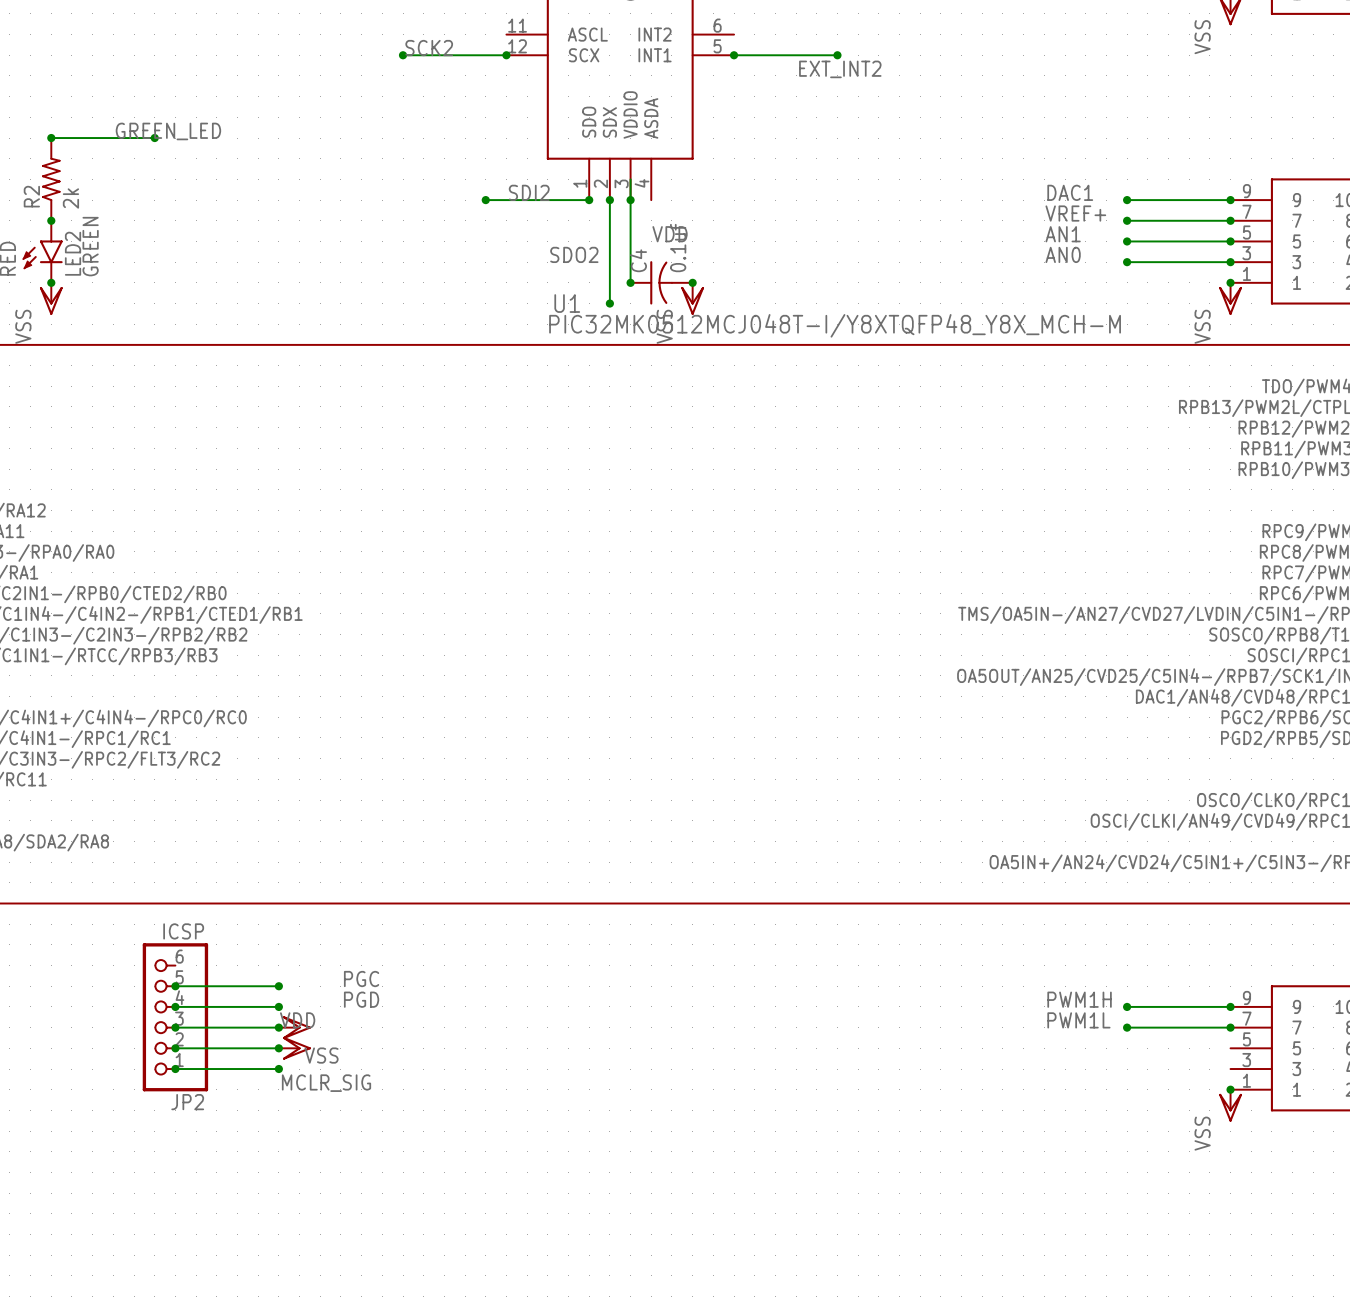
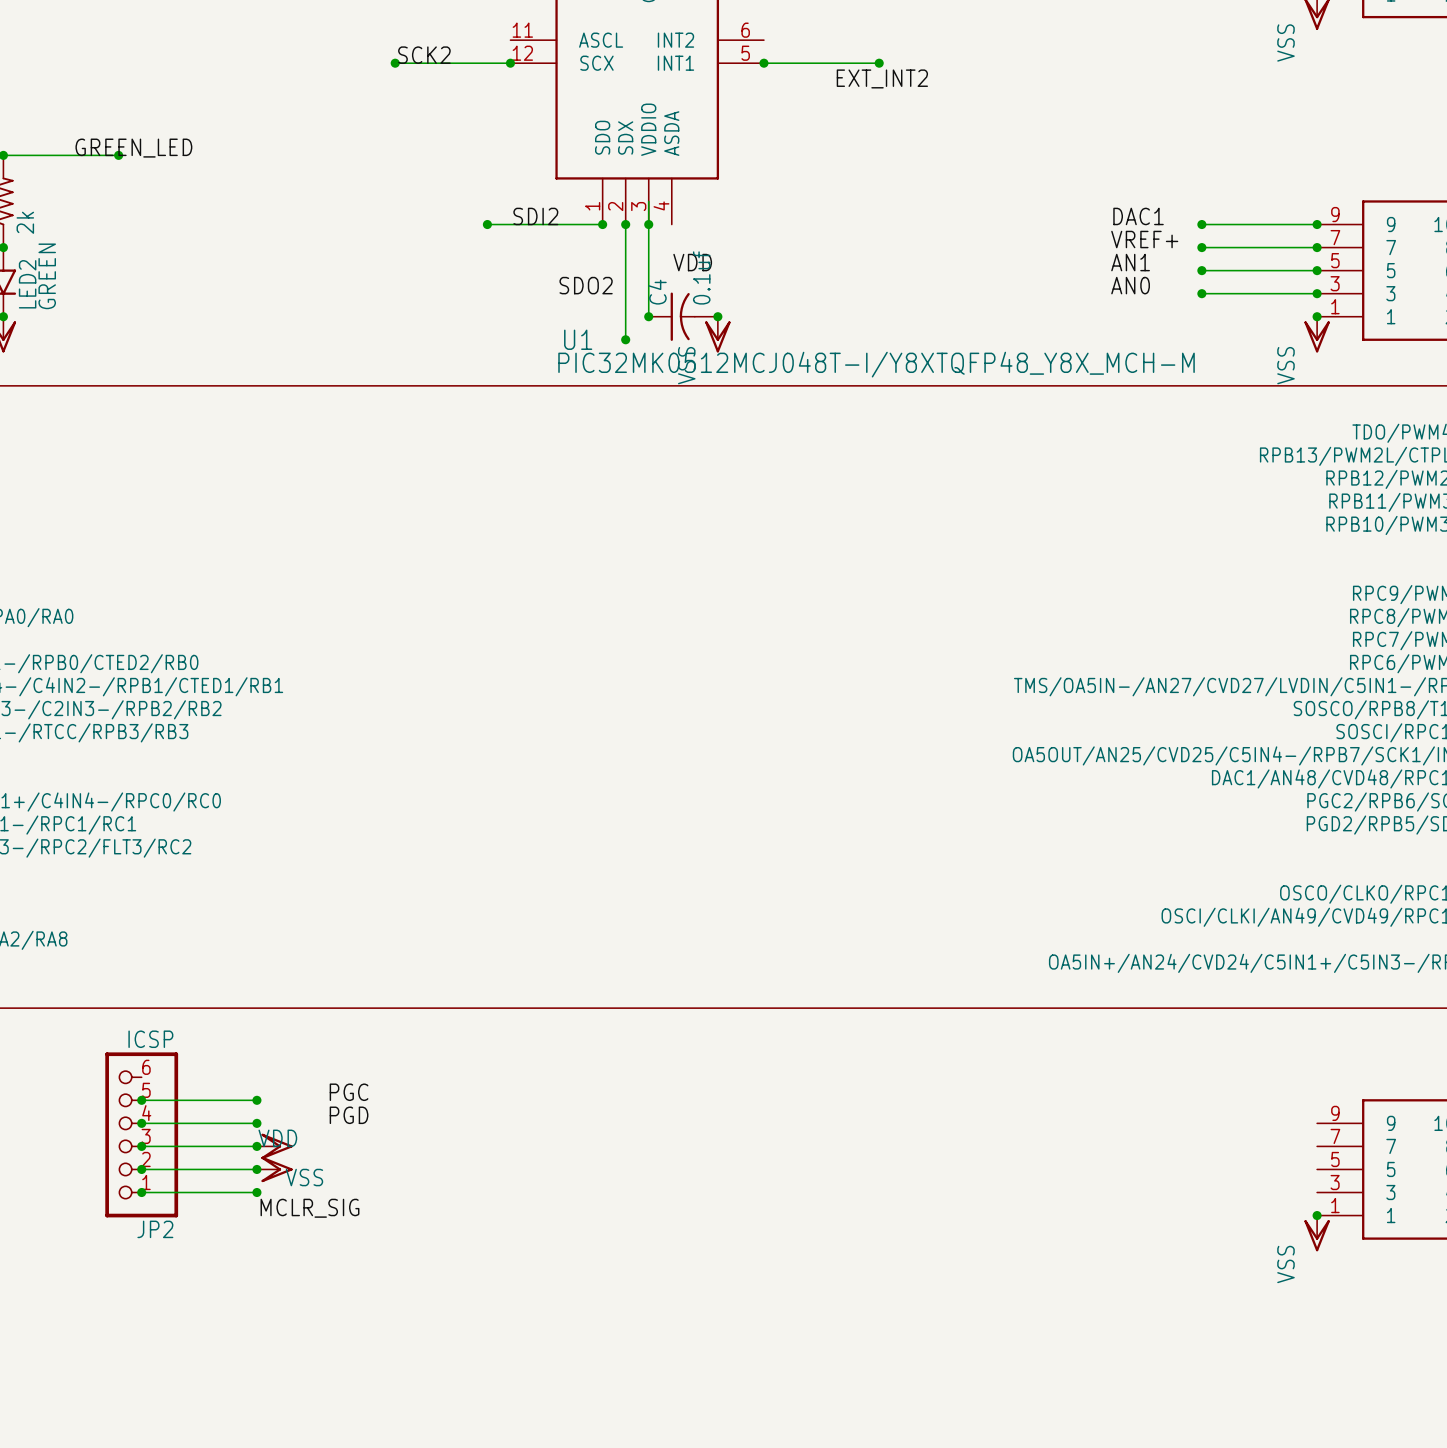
label: PWM1H (1079, 999) -> none
wire: (1127, 1006) (1230, 1006) -> none
junction: (1127, 1006) -> none
junction: (1230, 1006) -> none
label: PWM1L (1078, 1020) -> none
wire: (1127, 1027) (1230, 1027) -> none
junction: (1127, 1027) -> none
junction: (1230, 1027) -> none

